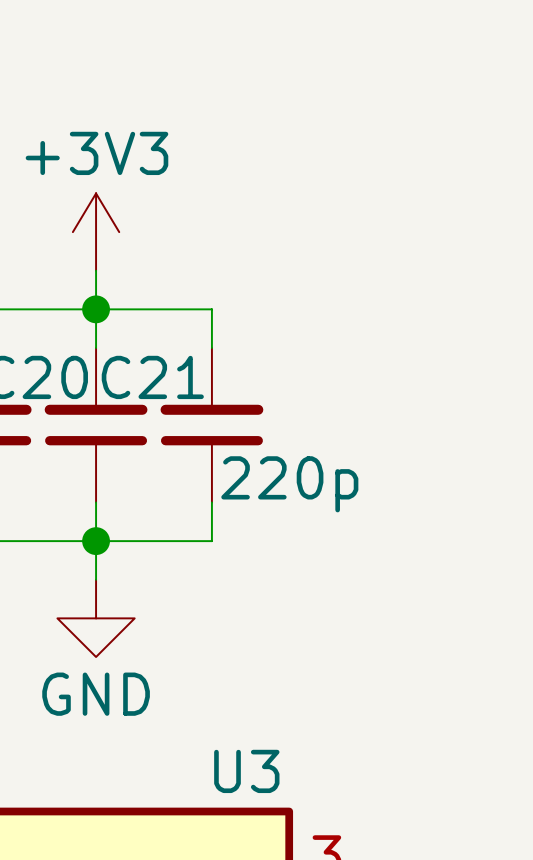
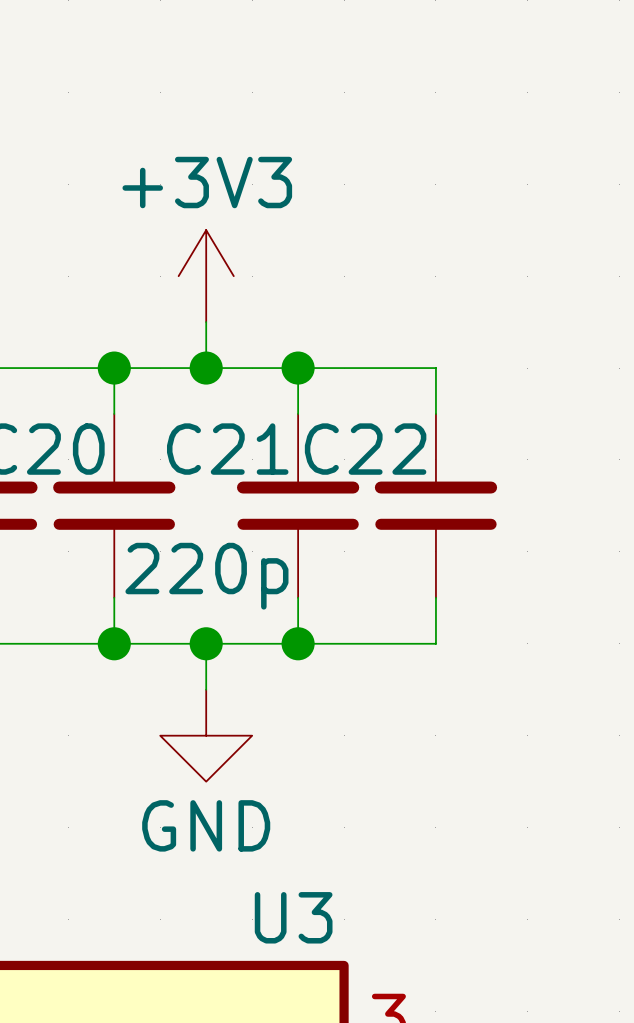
power symbol position: +3V3 (96, 232) -> +3V3 (206, 276)
wire: (96, 270) (96, 309) -> (206, 322) (206, 368)
junction: none -> (206, 368)
wire: (211, 309) (211, 347) -> (252, 368) (435, 368) (435, 414)
wire: none -> (298, 368) (298, 414)
junction: none -> (298, 368)
C21 position: (211, 425) -> (298, 505)
C22: none -> (435, 505)
C21 value position: 220p (289, 484) -> 220p (206, 576)
wire: (211, 502) (211, 541) -> (435, 597) (435, 643) (252, 643)
wire: none -> (298, 597) (298, 643)
wire: (96, 541) (96, 579) -> (206, 643) (206, 689)
junction: none -> (206, 643)
junction: none -> (298, 643)
power symbol position: GND (96, 618) -> GND (206, 735)

